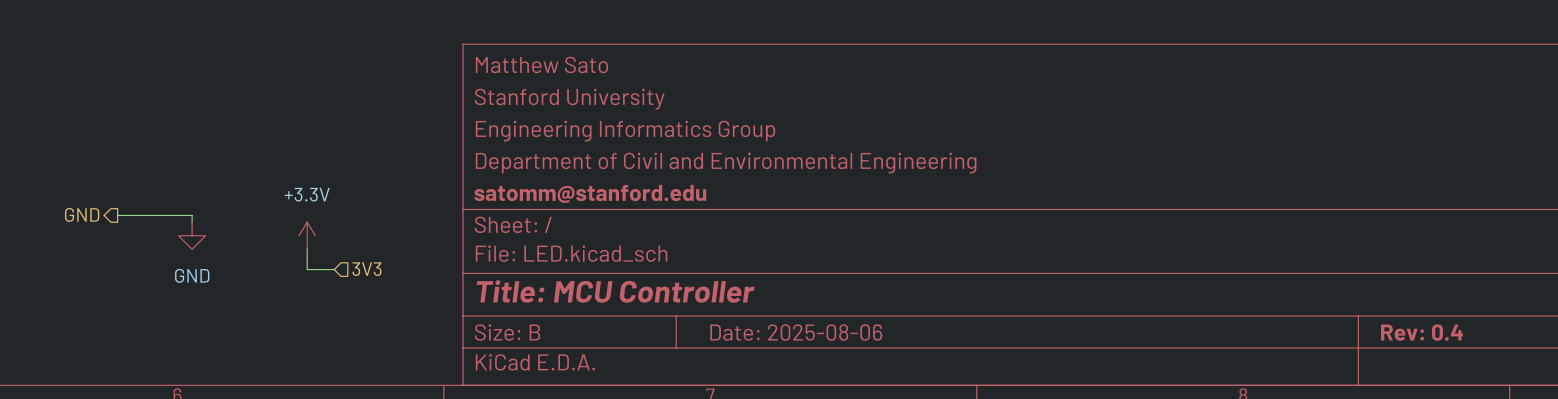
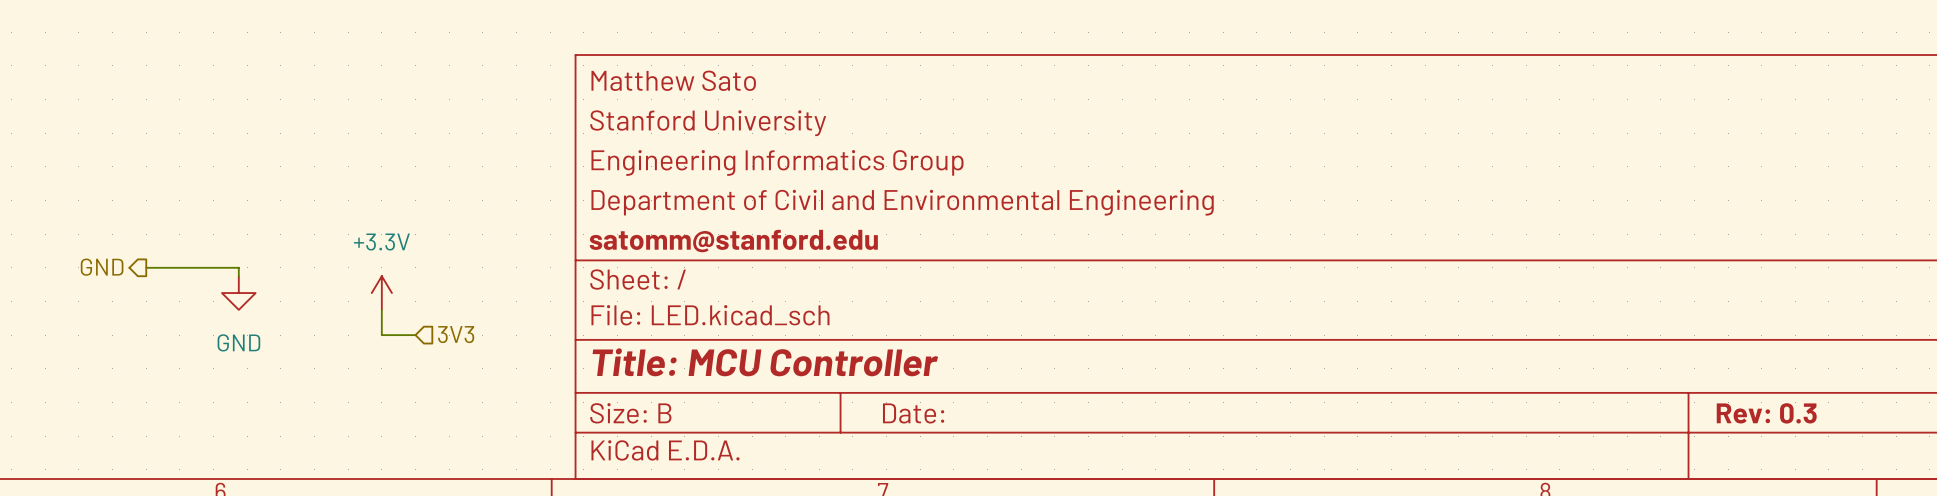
title block: Date: 2025-08-06 (796, 332) -> Date: (913, 413)
title block: Rev: 0.4 (1421, 332) -> Rev: 0.3 (1766, 413)

